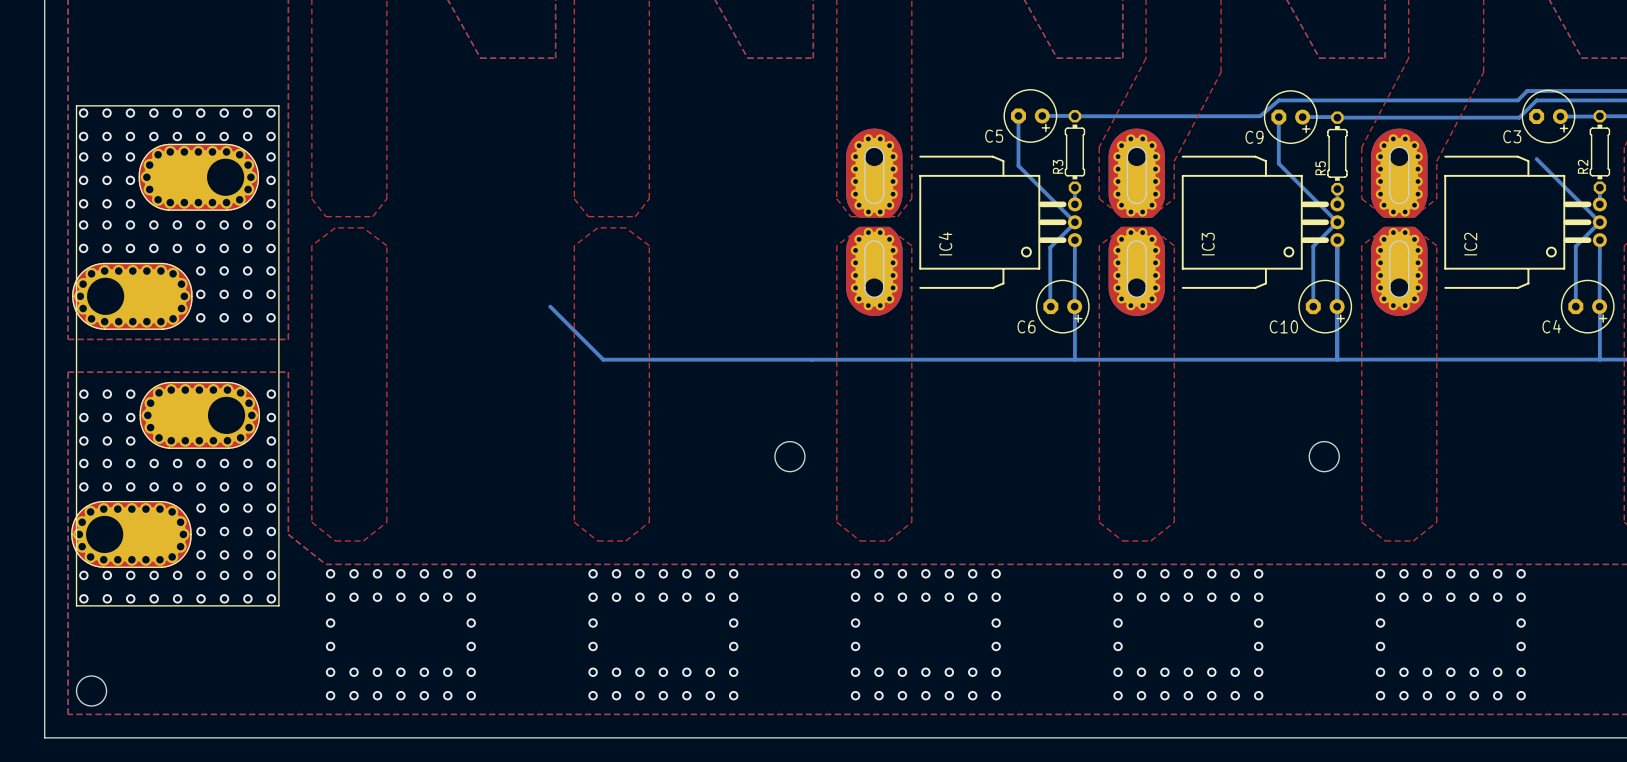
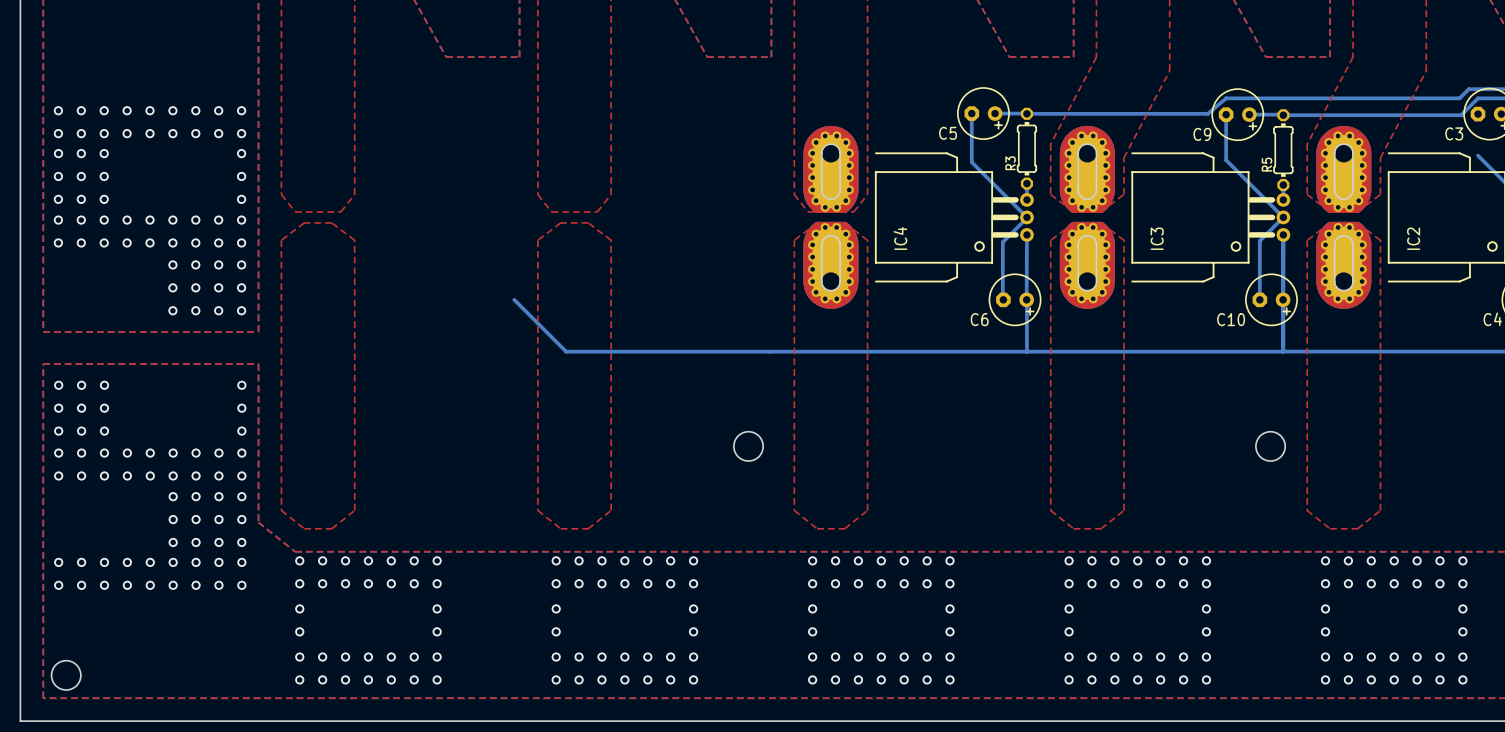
part: (175, 355) -> none

